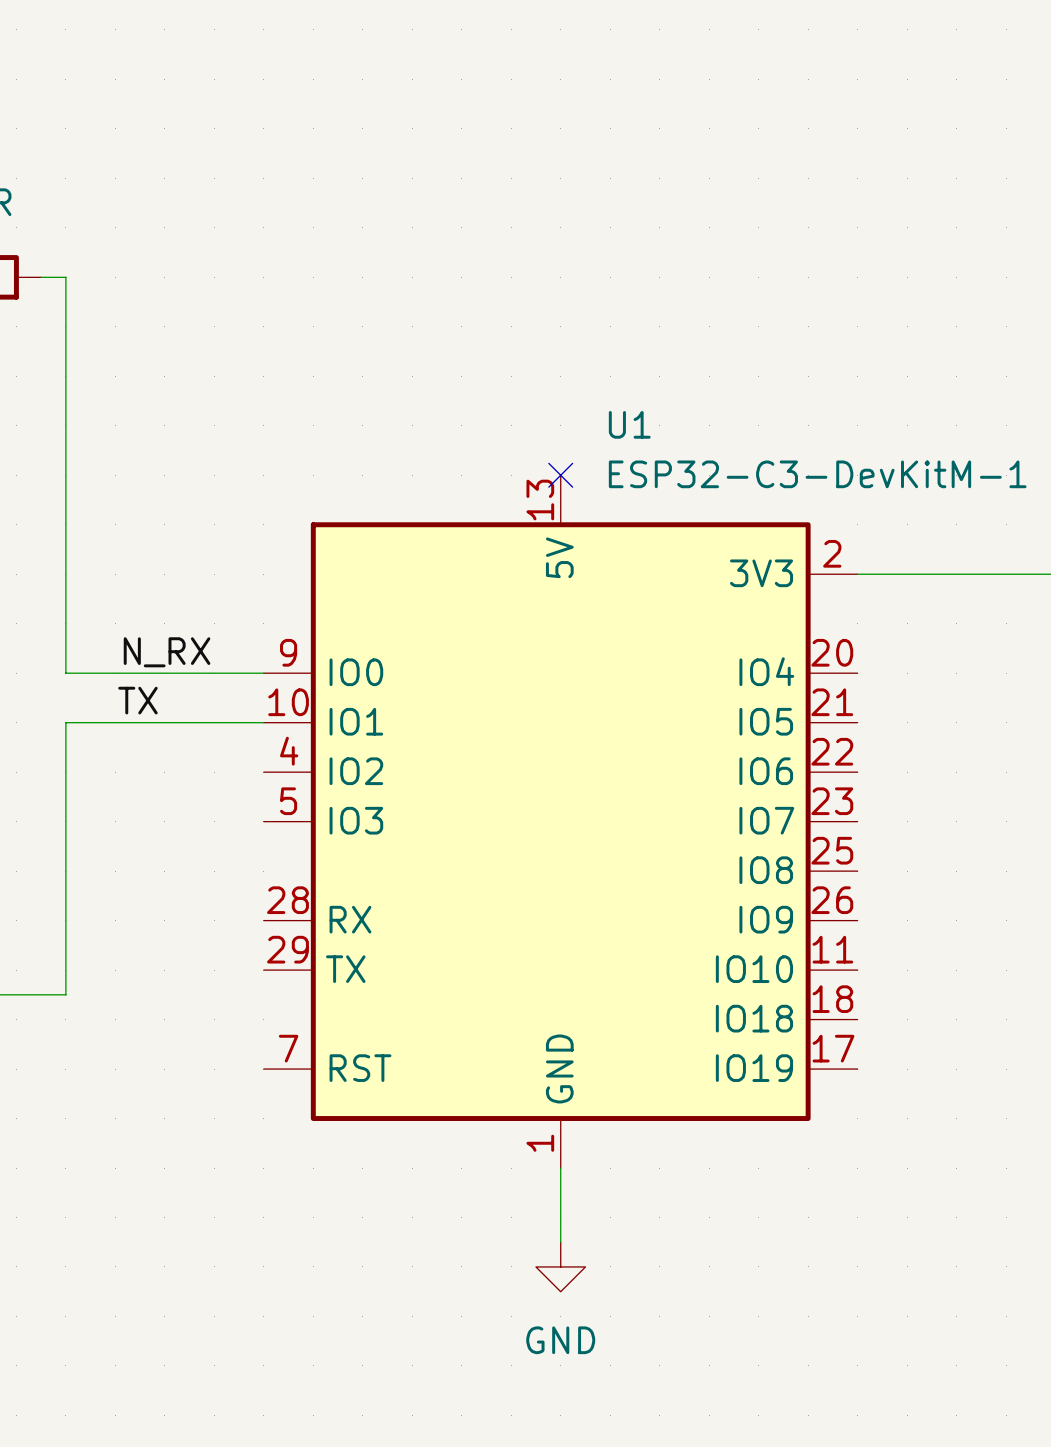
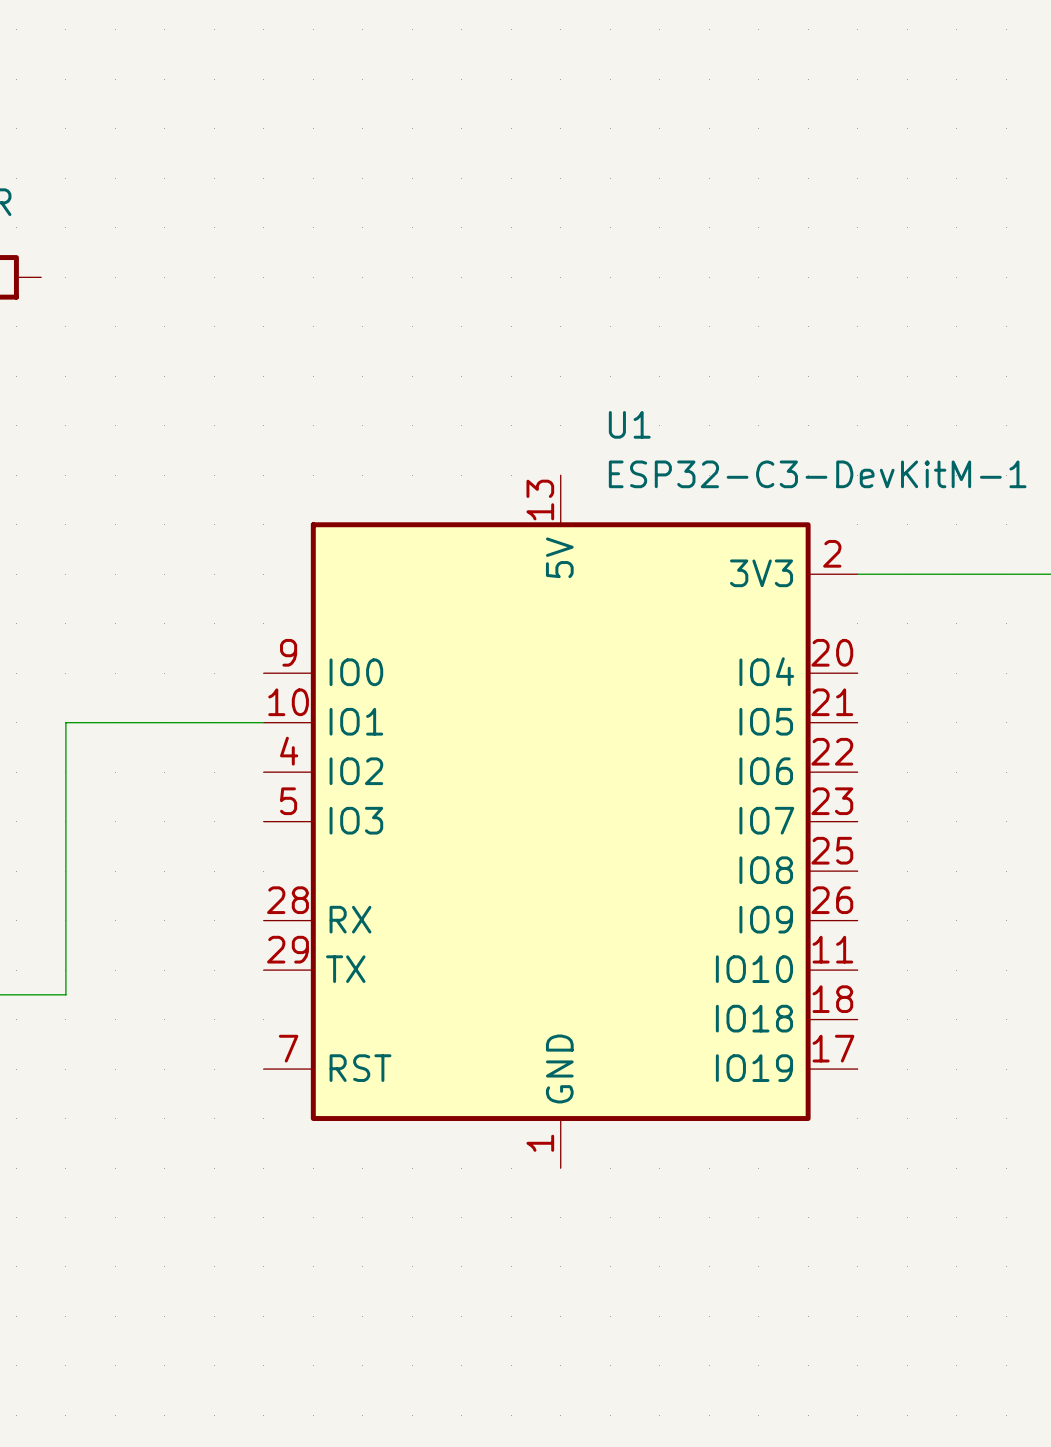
wire: (41, 277) (65, 277) (65, 673) (263, 673) -> none
no-connect mark: (560, 475) -> none
label: N_RX (167, 652) -> none
label: TX (137, 700) -> none
wire: (560, 1168) (560, 1242) -> none
power symbol: GND (560, 1266) -> none

